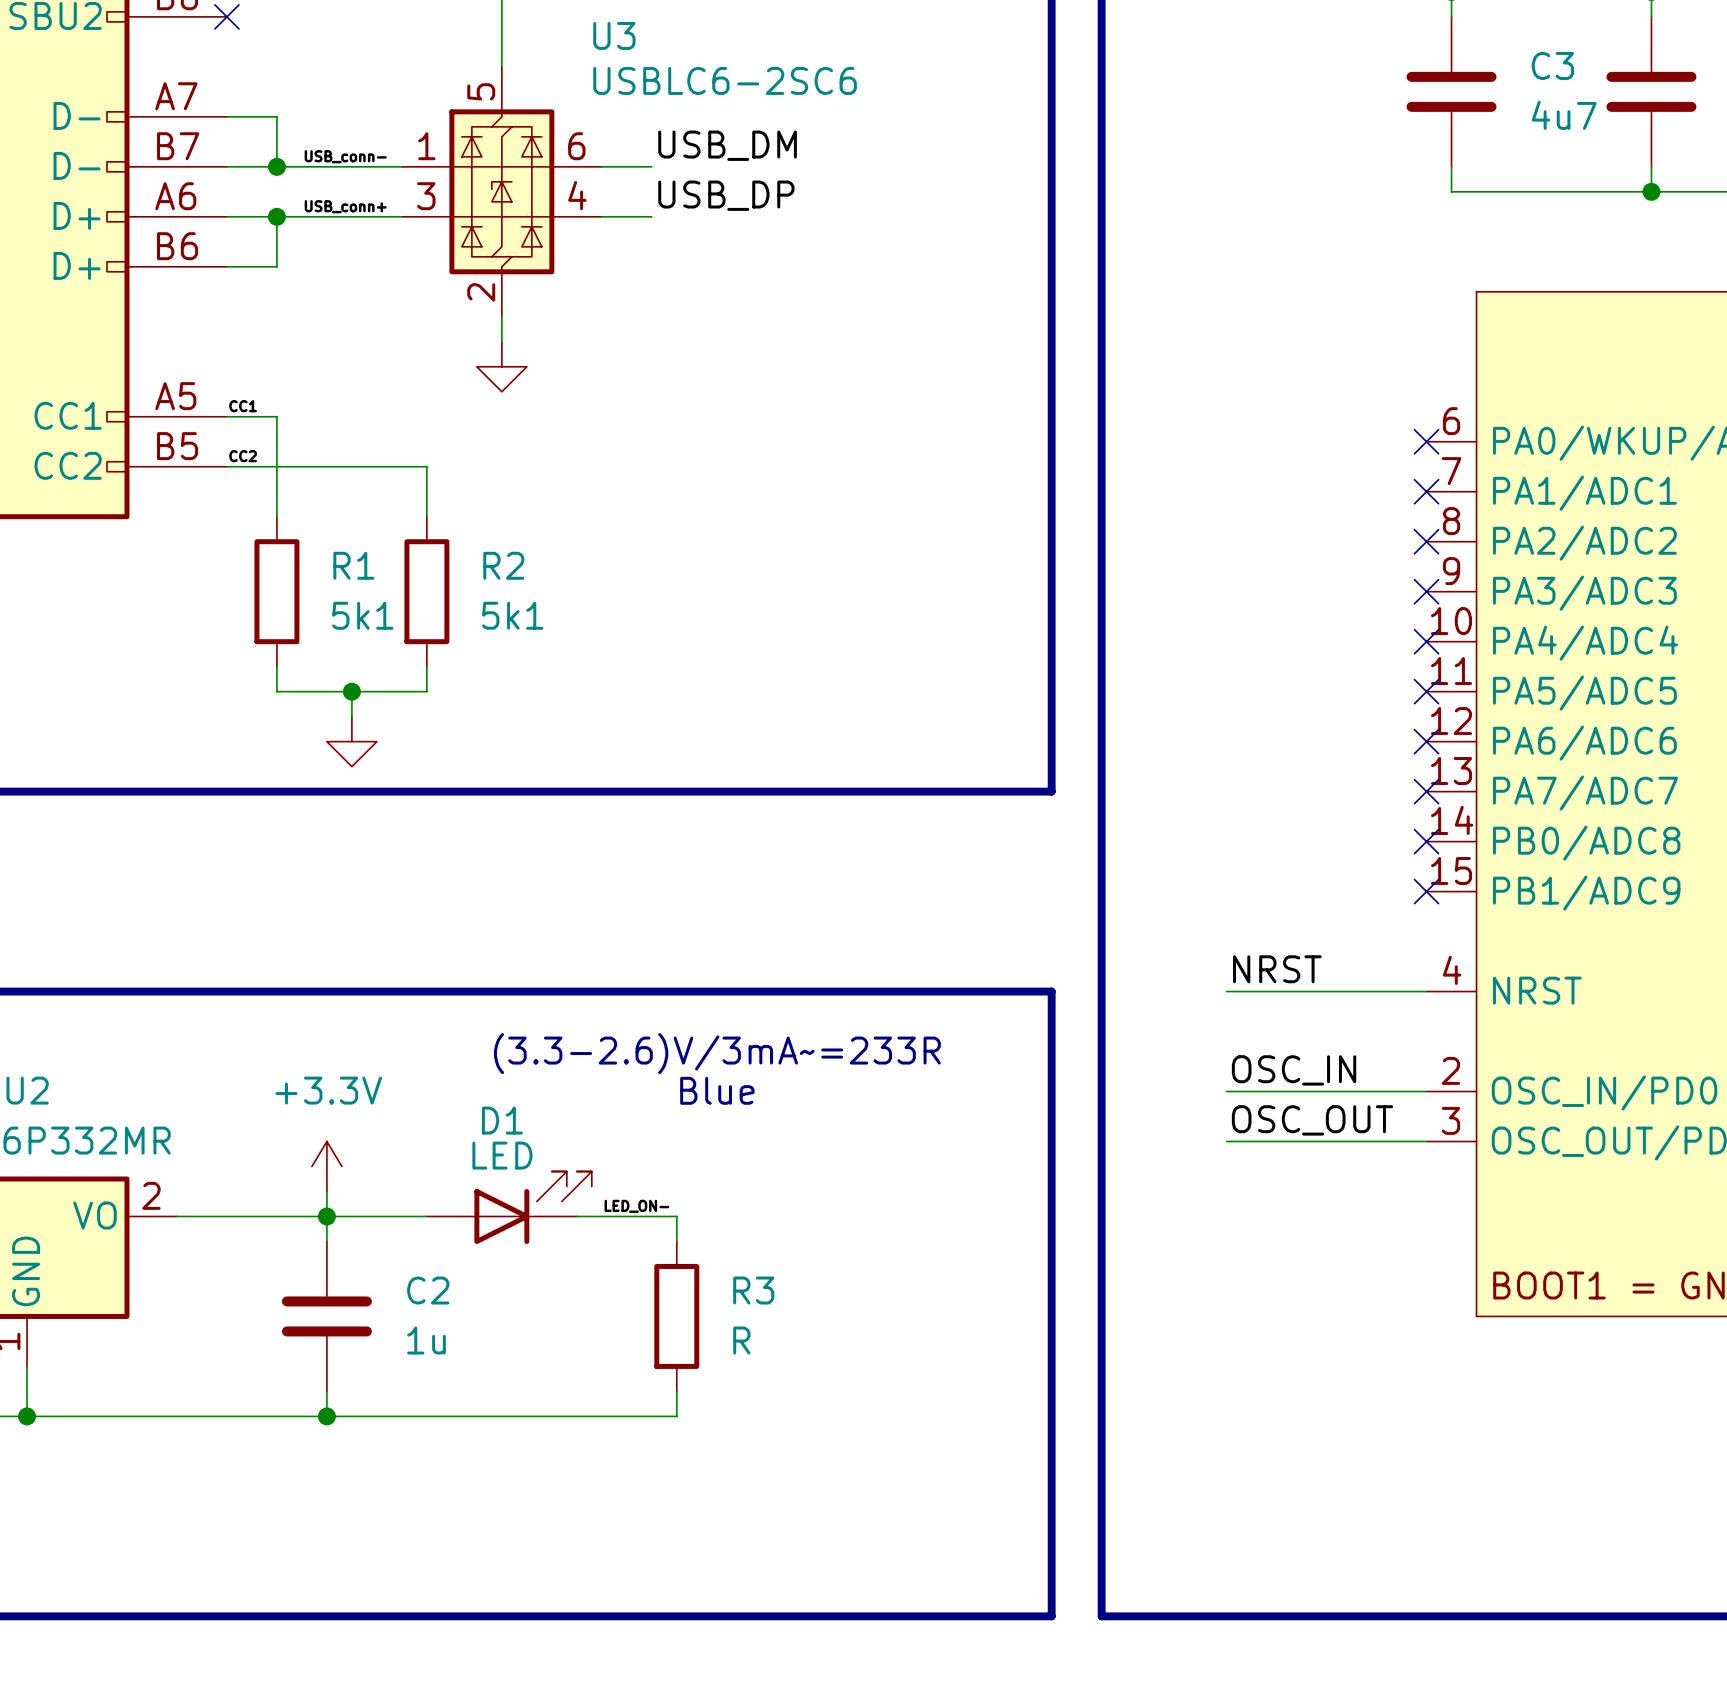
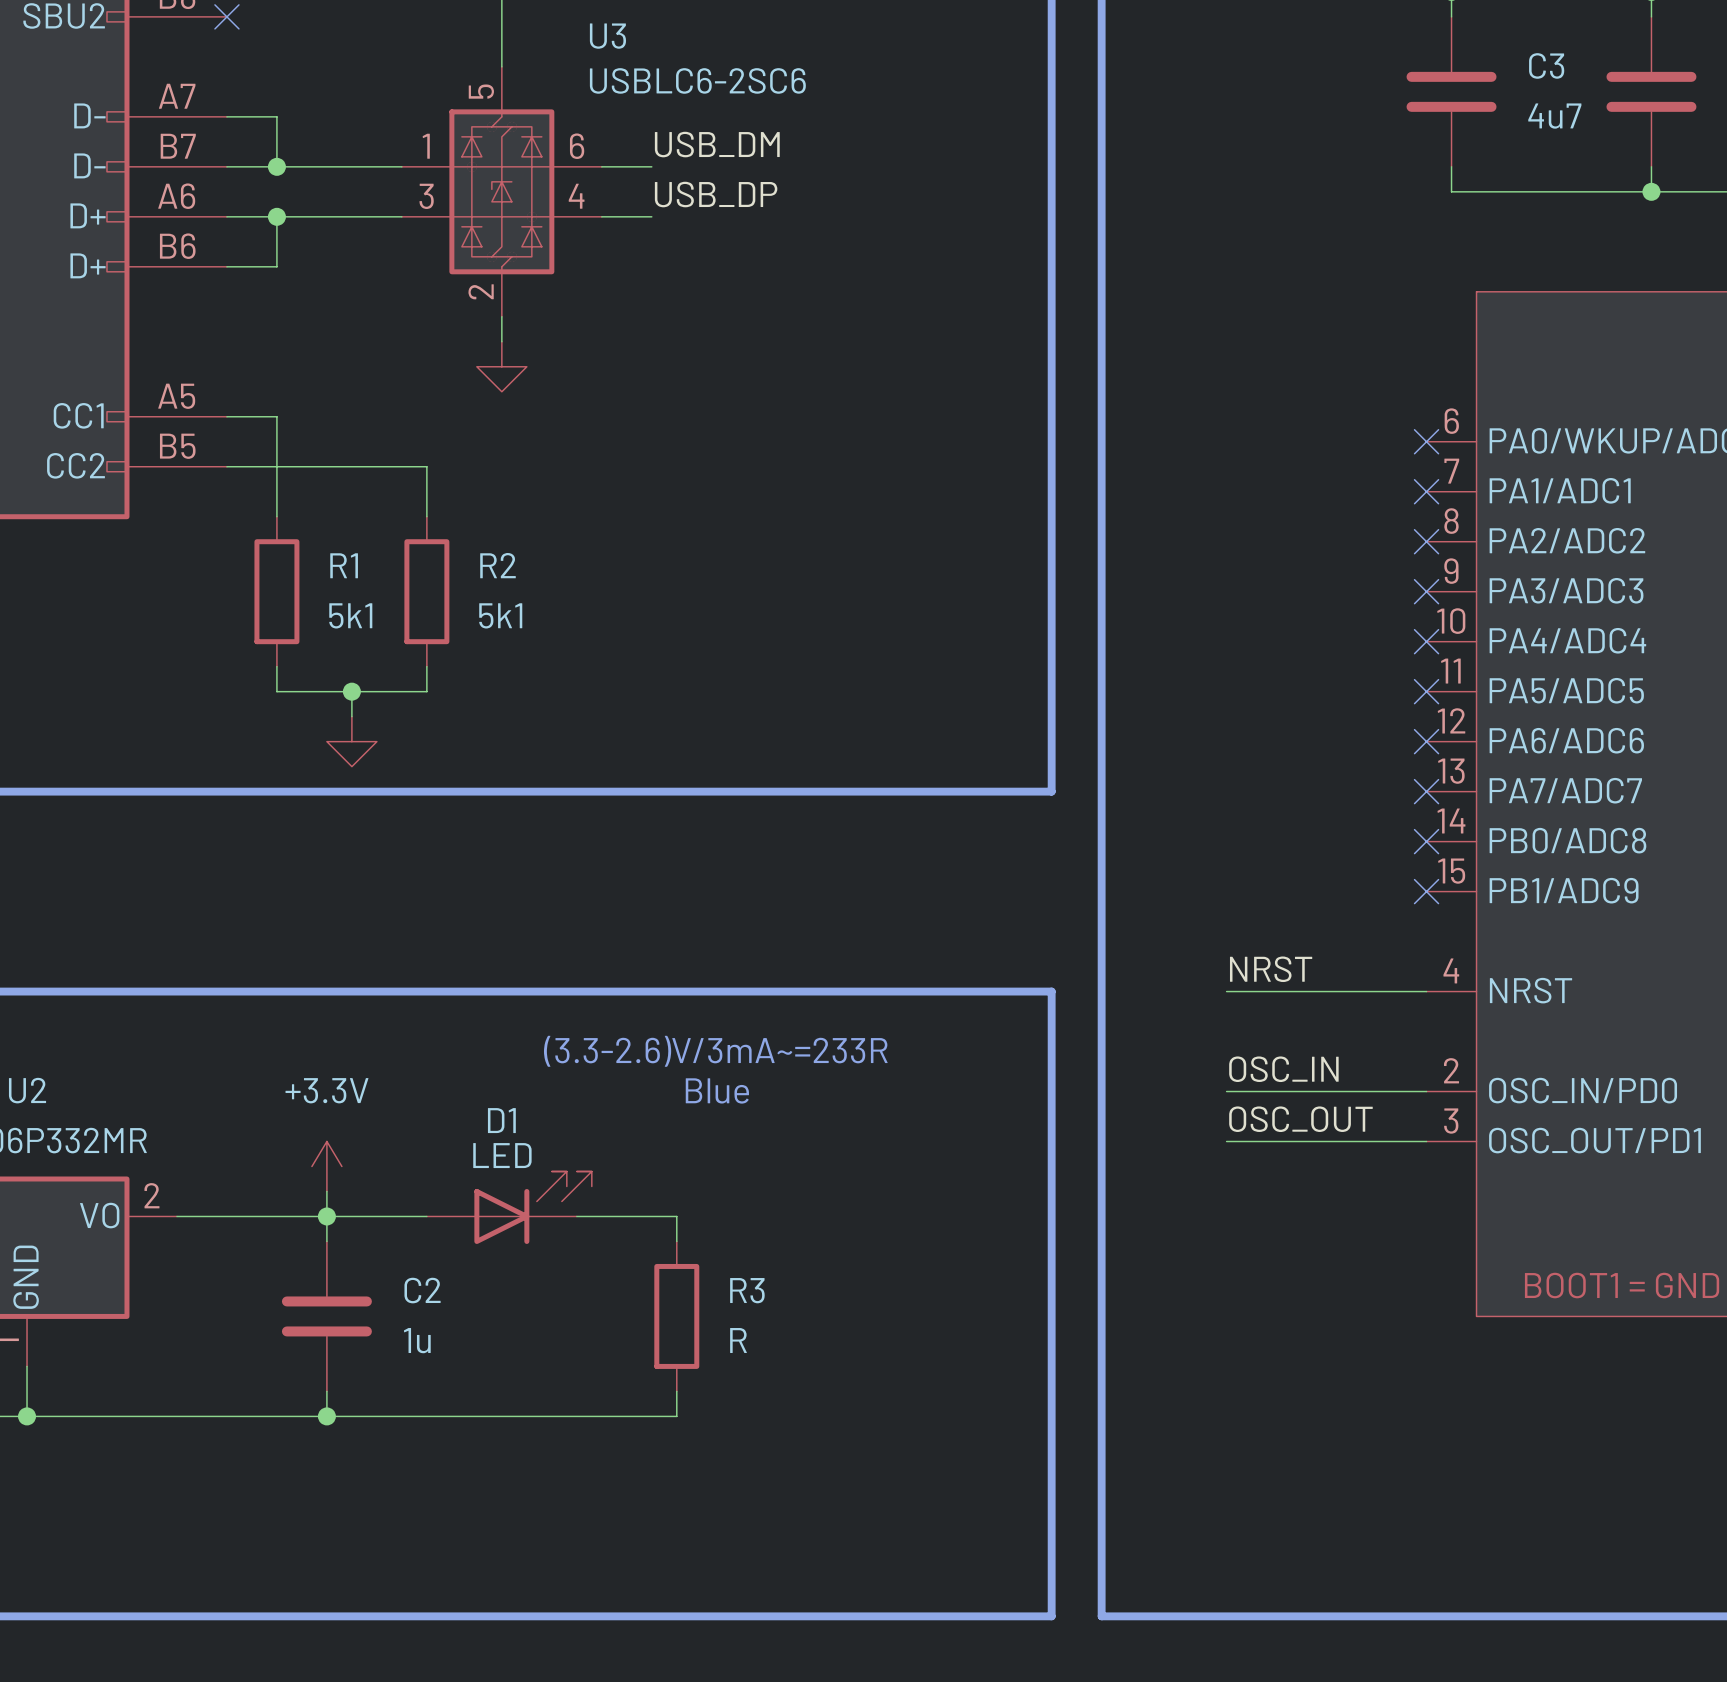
label: USB_conn- (345, 156) -> none
label: USB_conn+ (345, 206) -> none
label: CC1 (243, 406) -> none
label: CC2 (243, 456) -> none
label: LED_ON- (636, 1206) -> none

